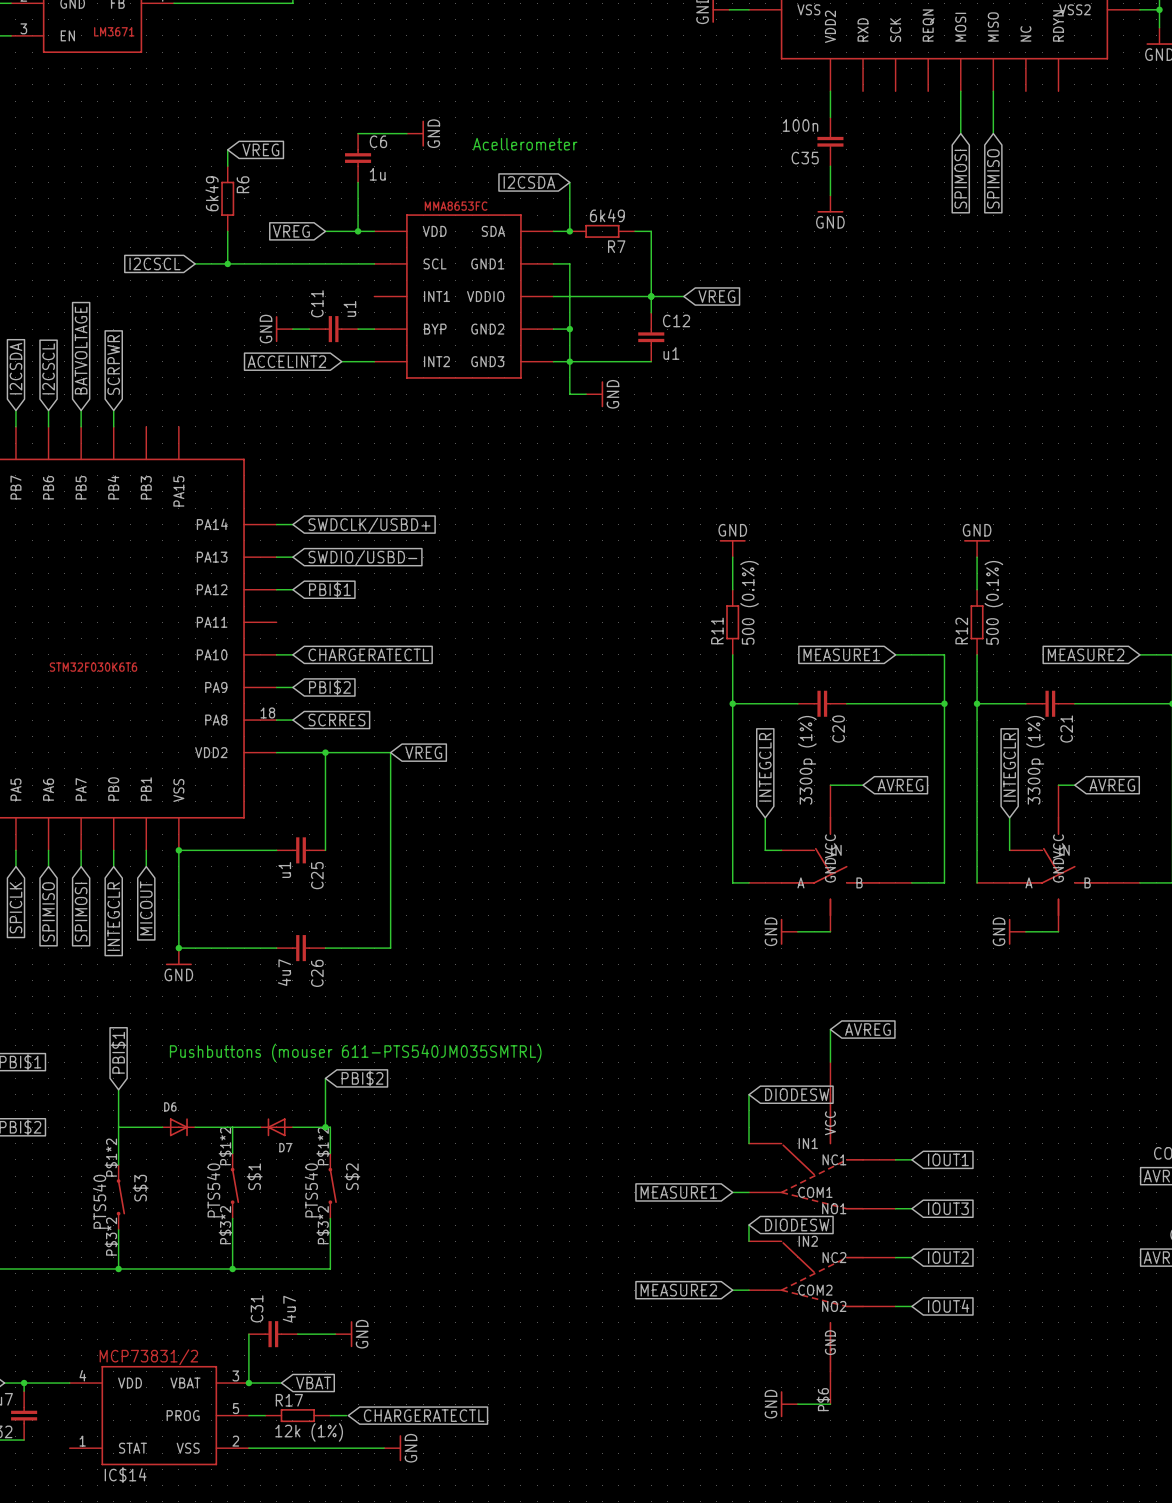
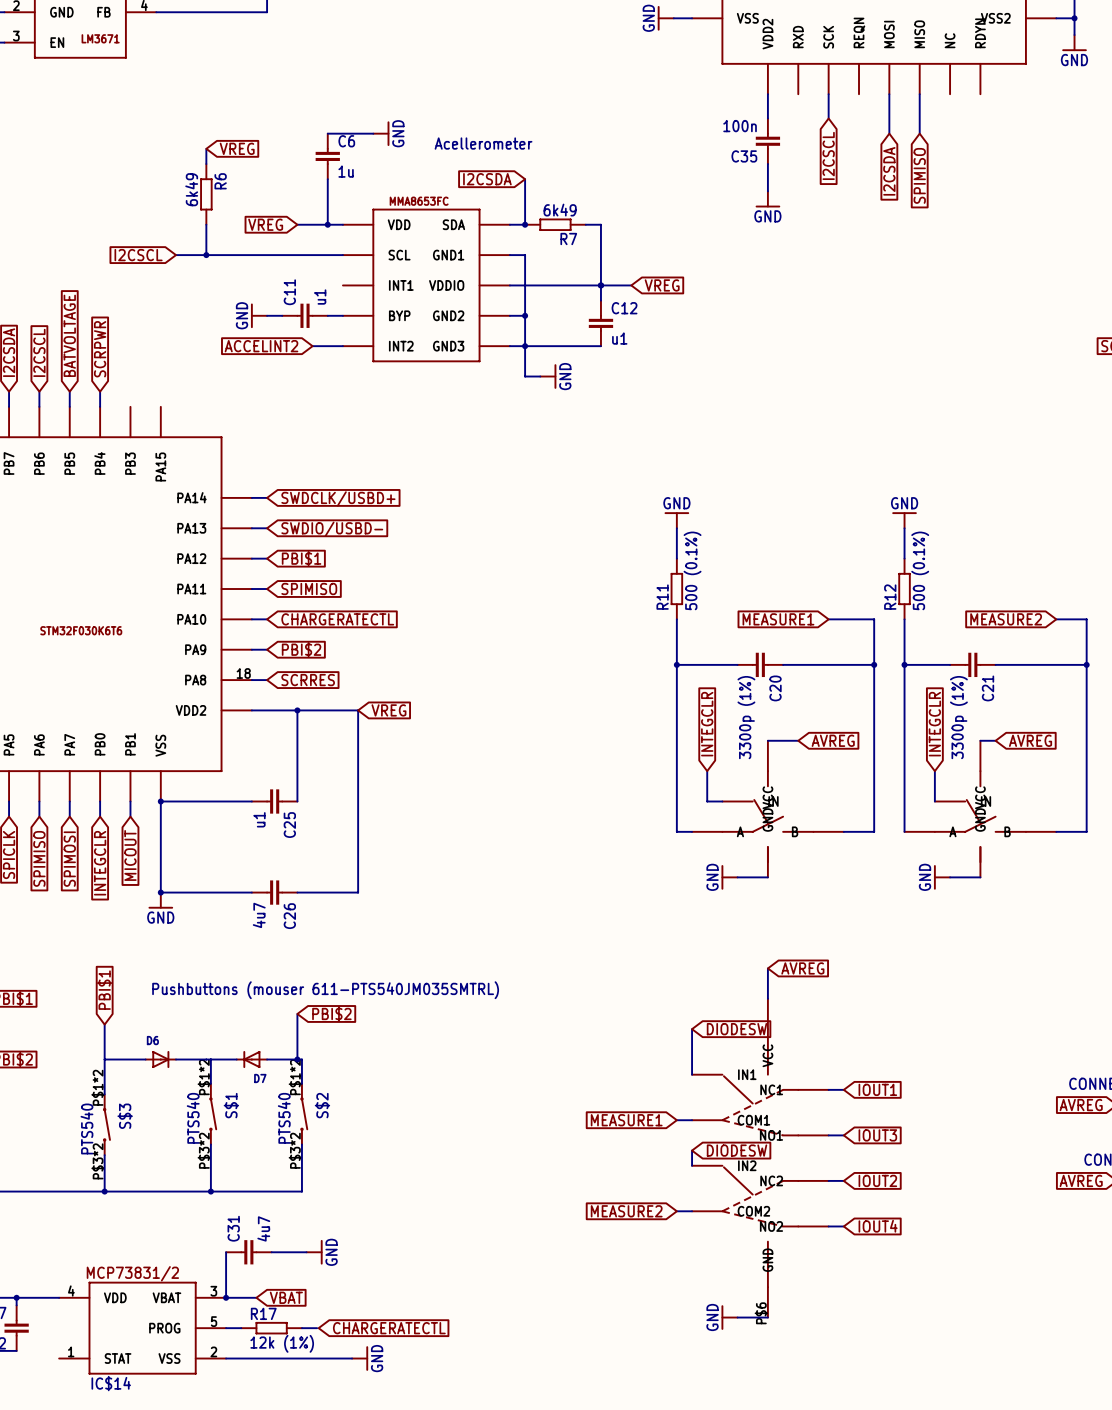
wire: none -> (828, 94) (828, 118)
global label: none -> I2CSCL (828, 155)
global label: SPIMOSI (960, 179) -> I2CSDA (889, 171)
wire: none -> (251, 589) (267, 589)
global label: none -> SPIMISO (309, 589)

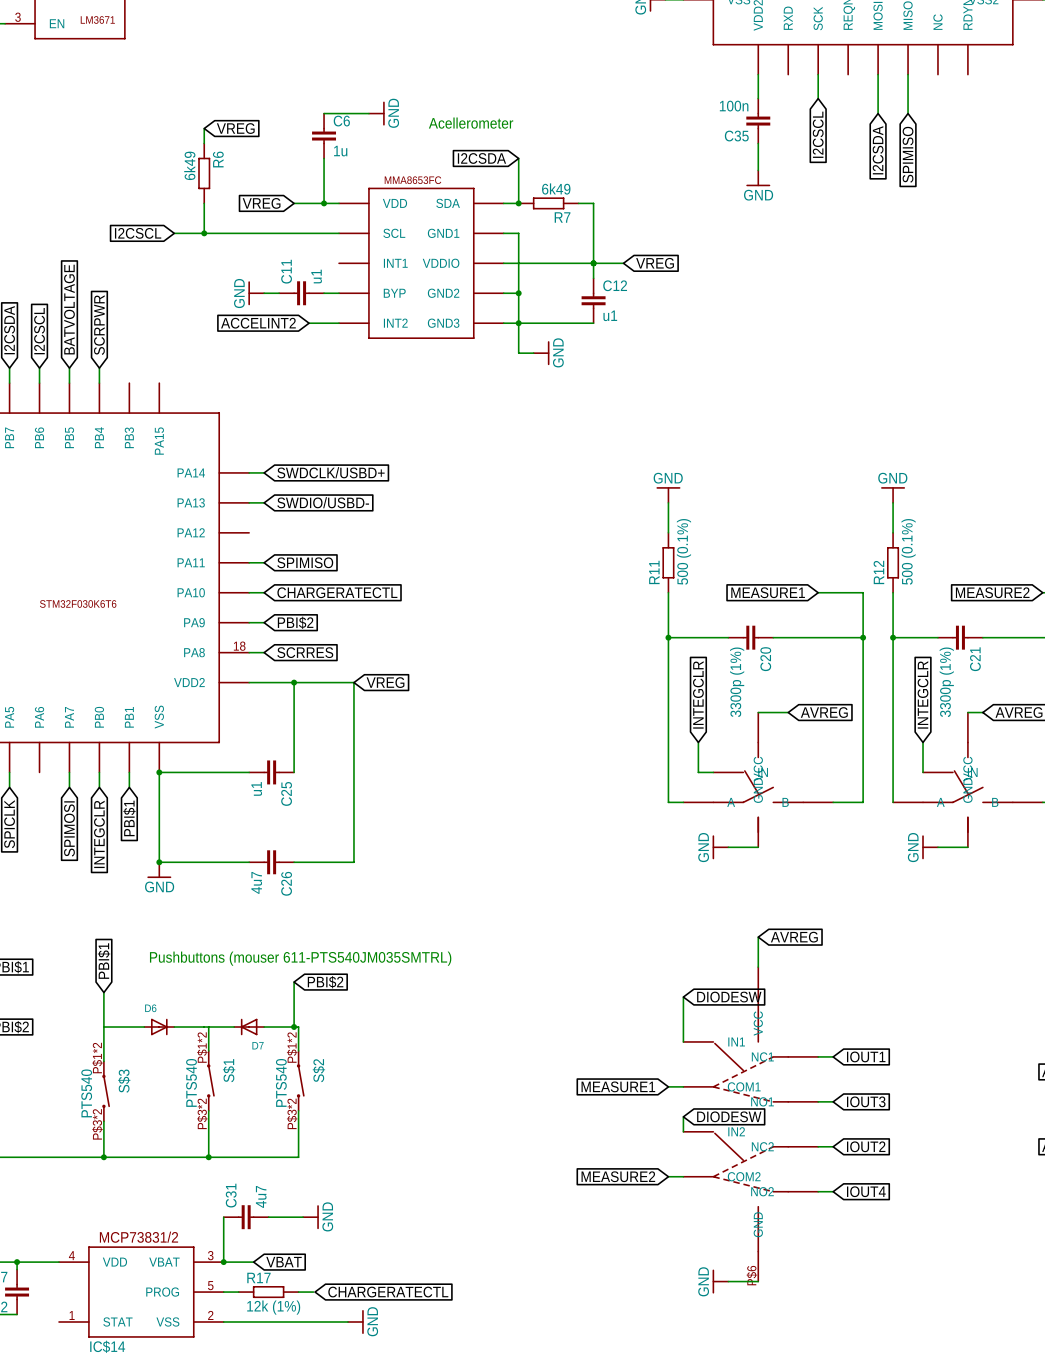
wire: (251, 558) (267, 558) -> none
global label: PBI$1 (301, 558) -> none
wire: (39, 801) (39, 816) -> none
global label: MICOUT (130, 855) -> PBI$1 (129, 818)
global label: SPIMISO (39, 858) -> none

